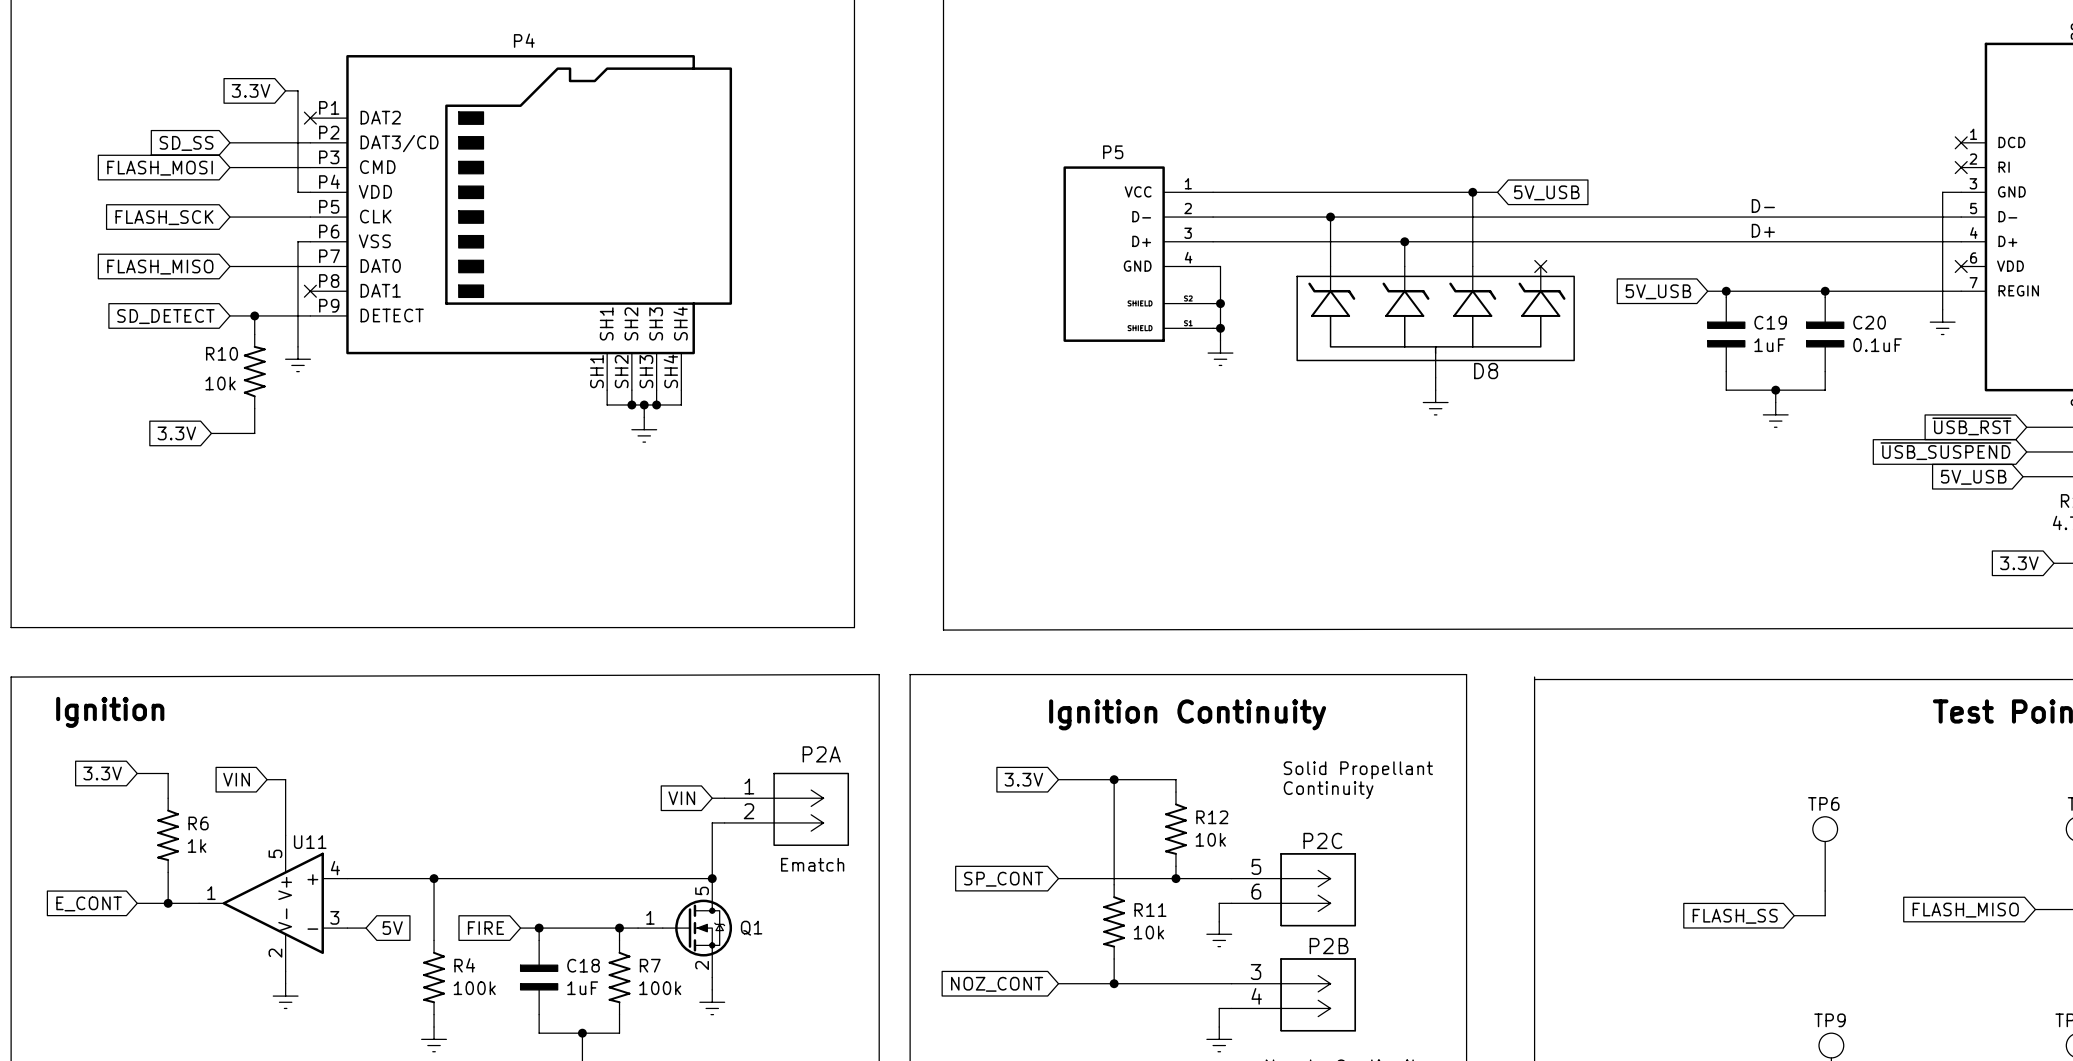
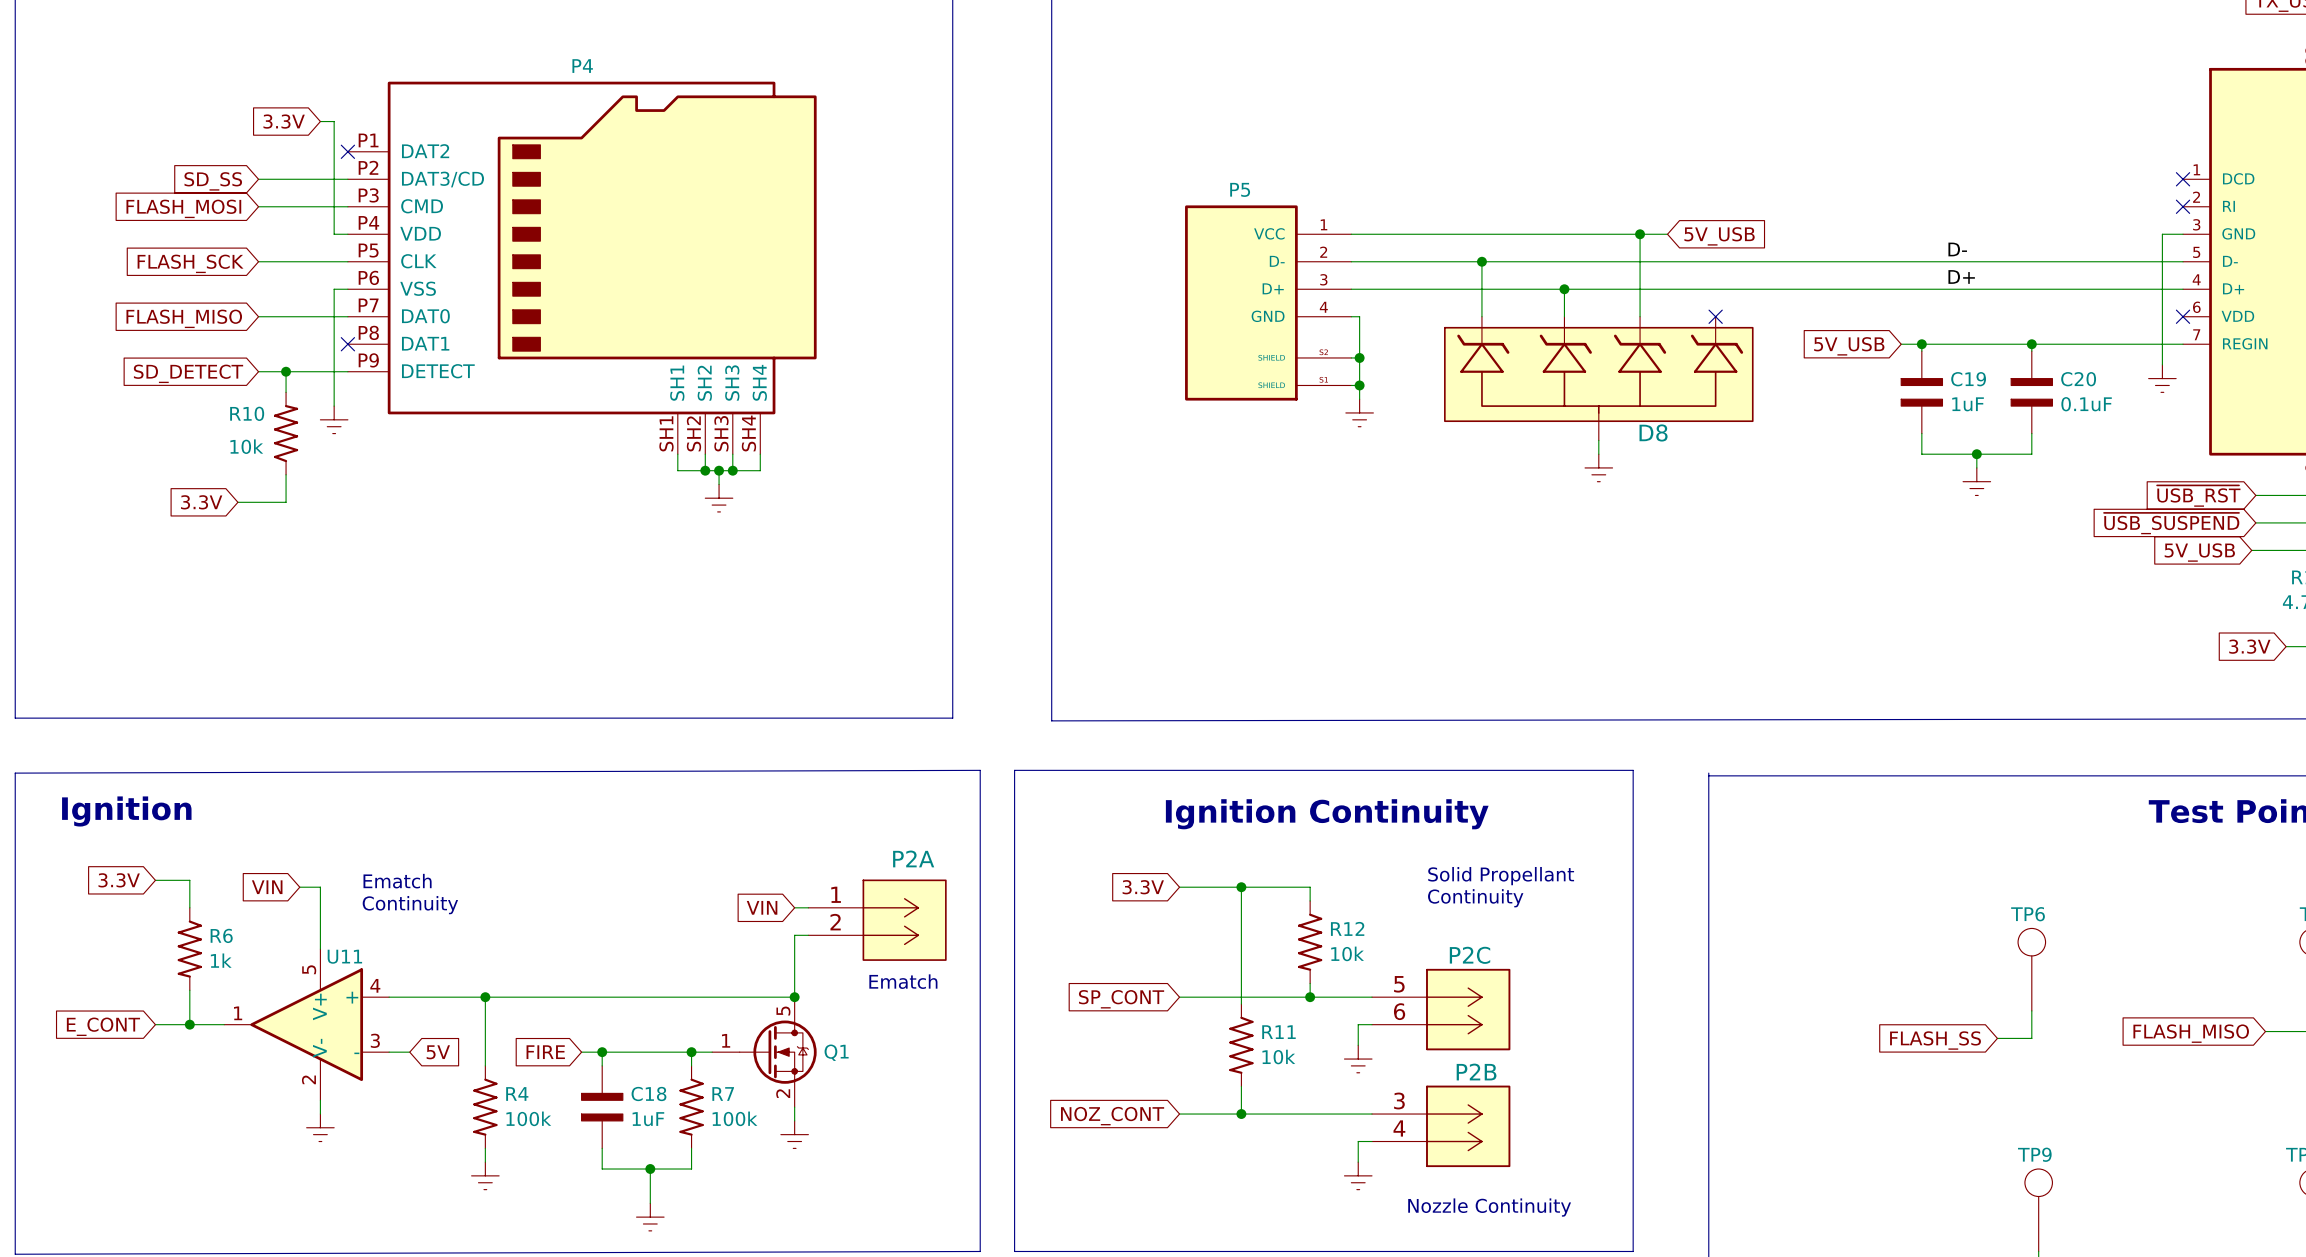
text: none -> Ematch (397, 881)
text: none -> Continuity (410, 905)

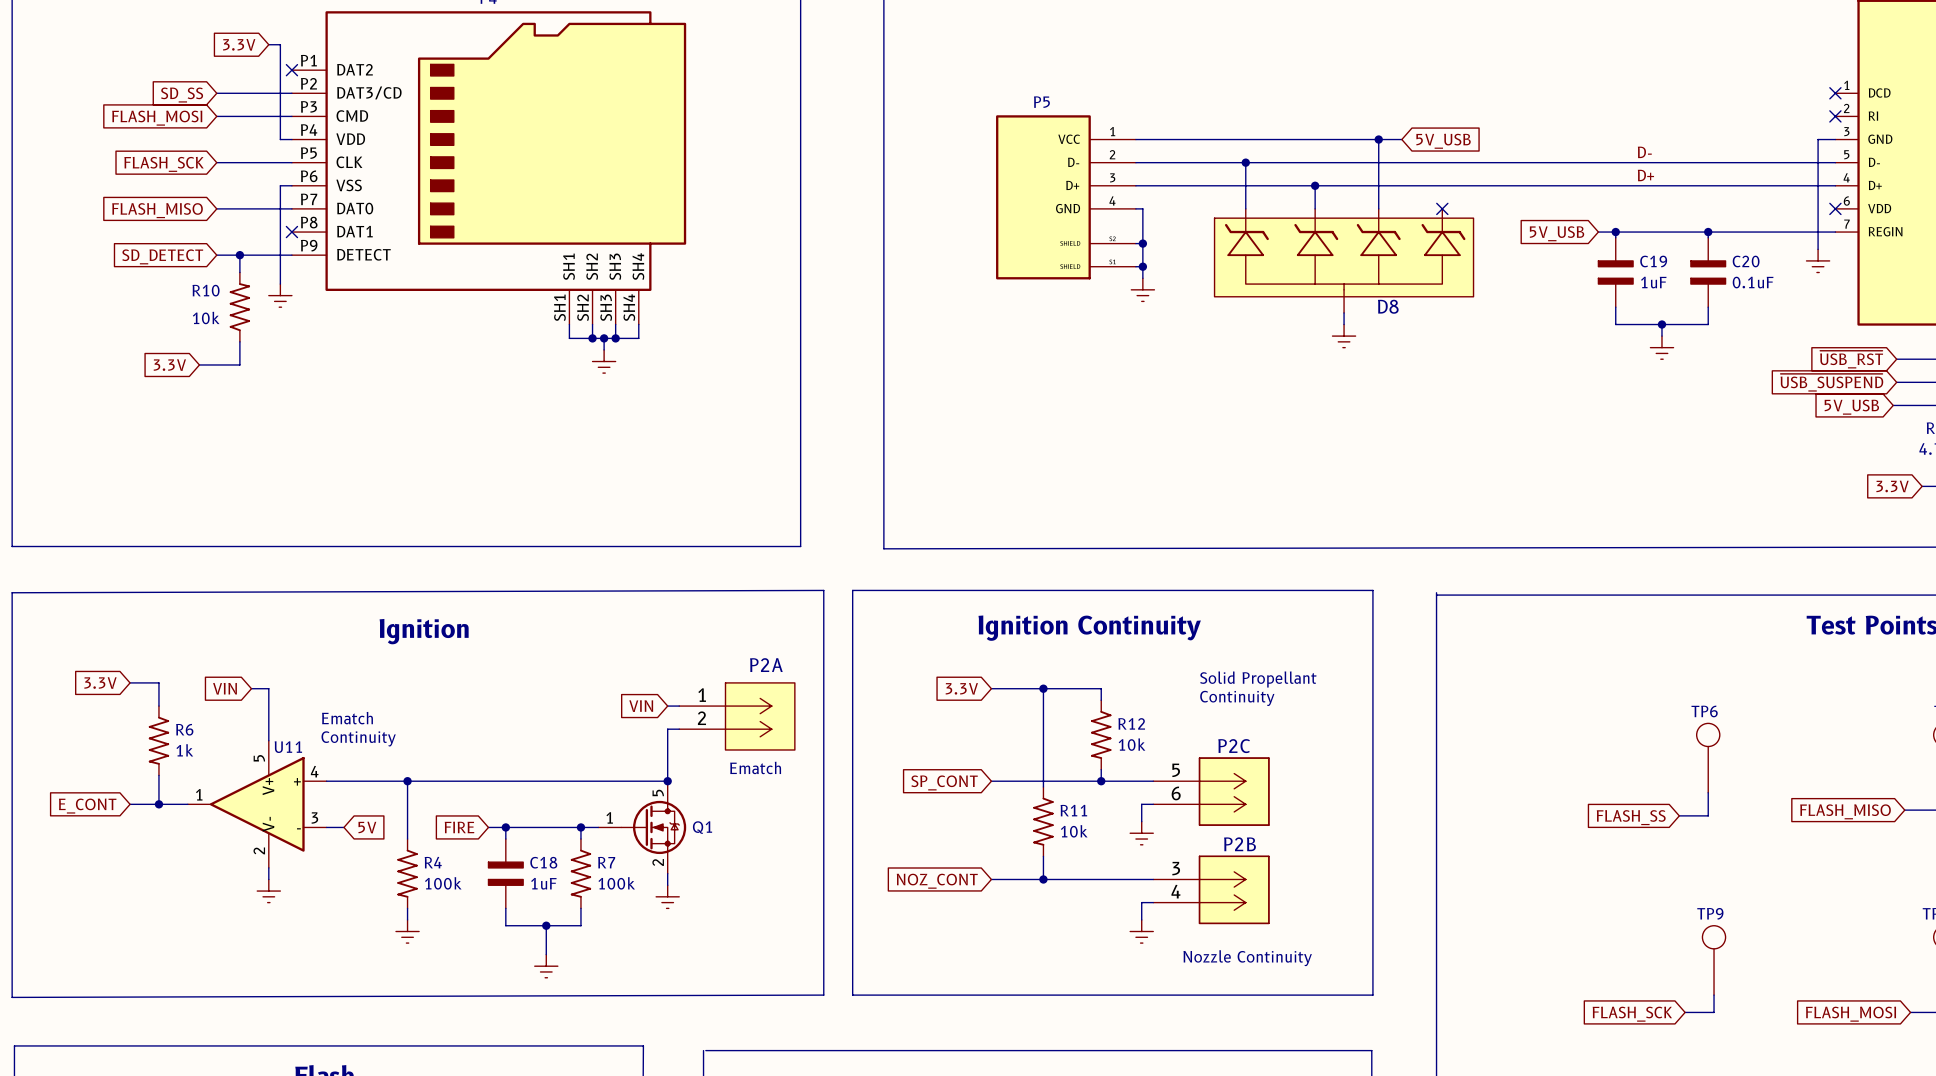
text: Ignition (126, 811) -> none
text: none -> Ignition (424, 631)
text position: Ematch (397, 881) -> Ematch (347, 718)
text position: Continuity (410, 905) -> Continuity (358, 738)

